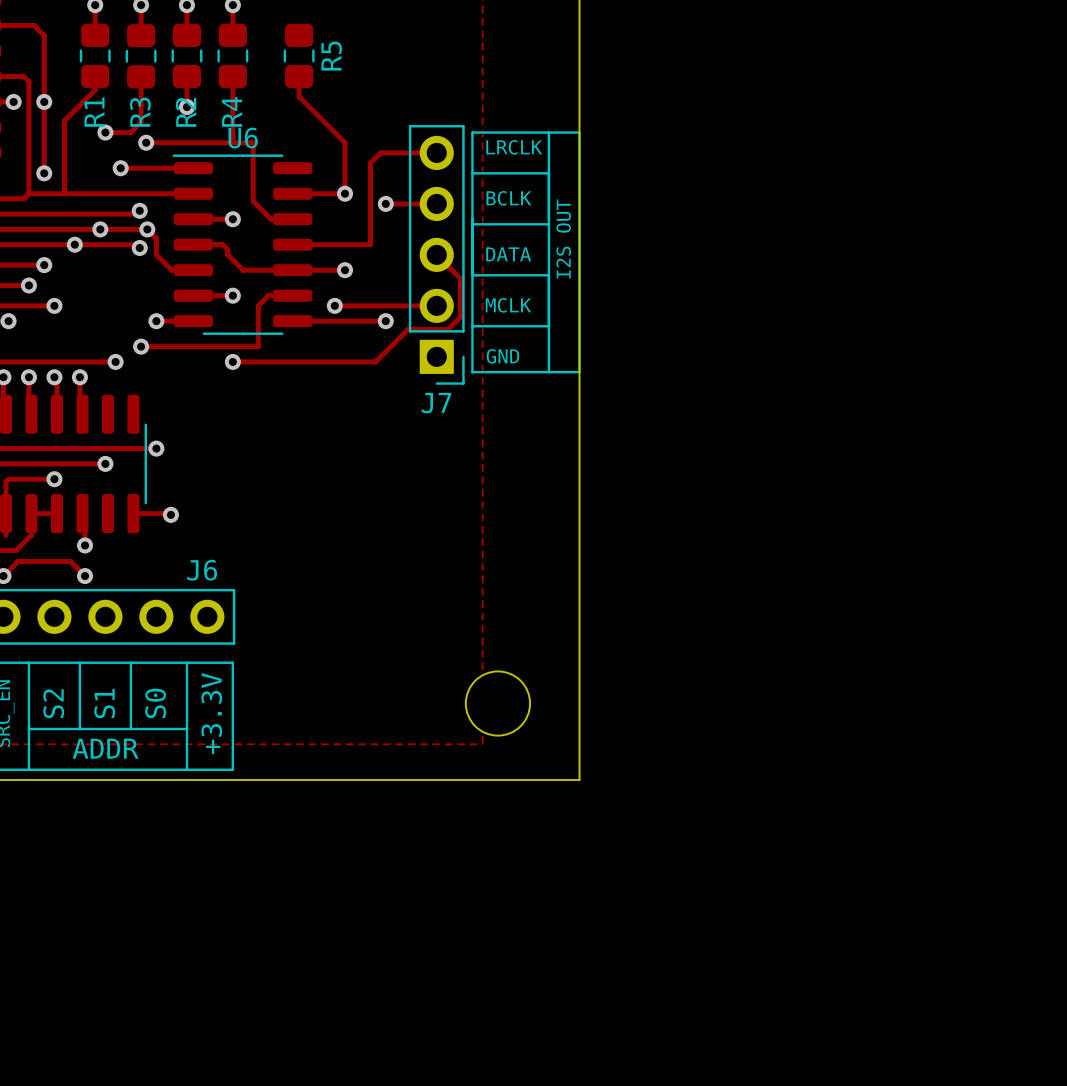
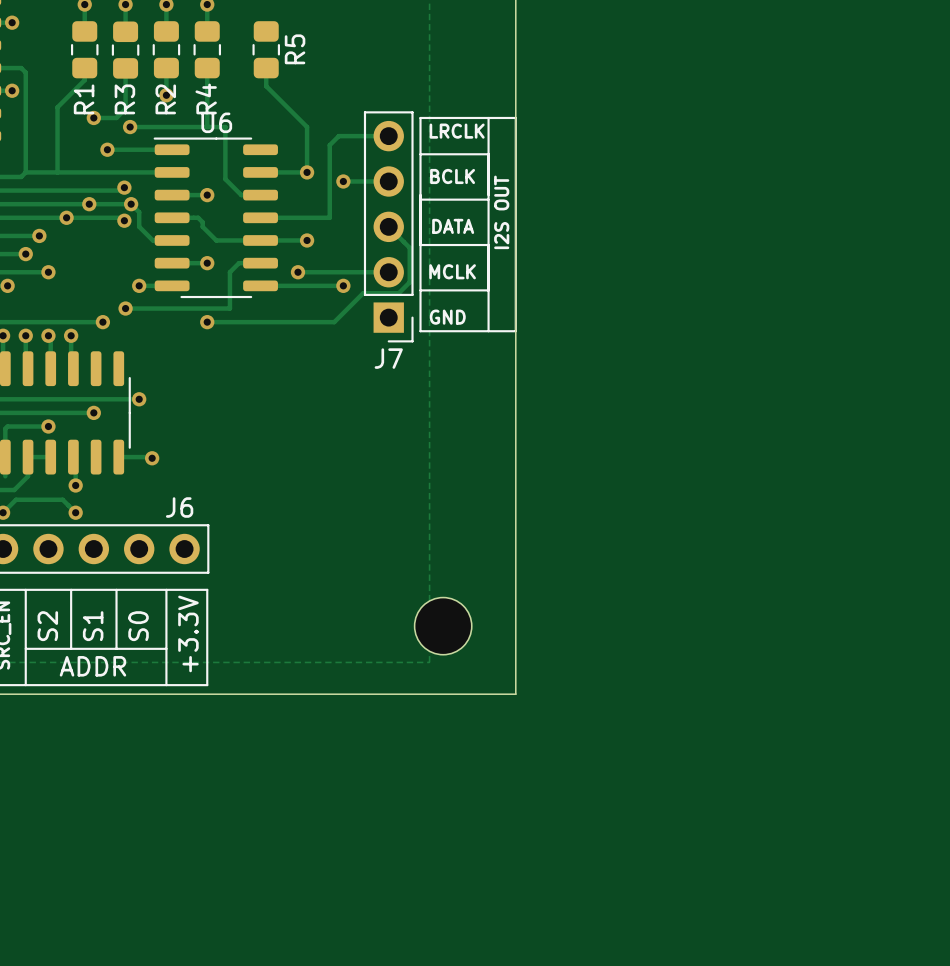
track: (13, 25) (34, 25) (44, 35) (44, 173) -> none
via: none -> (12, 22)
via: (44, 101) -> none
via: (44, 173) -> none

